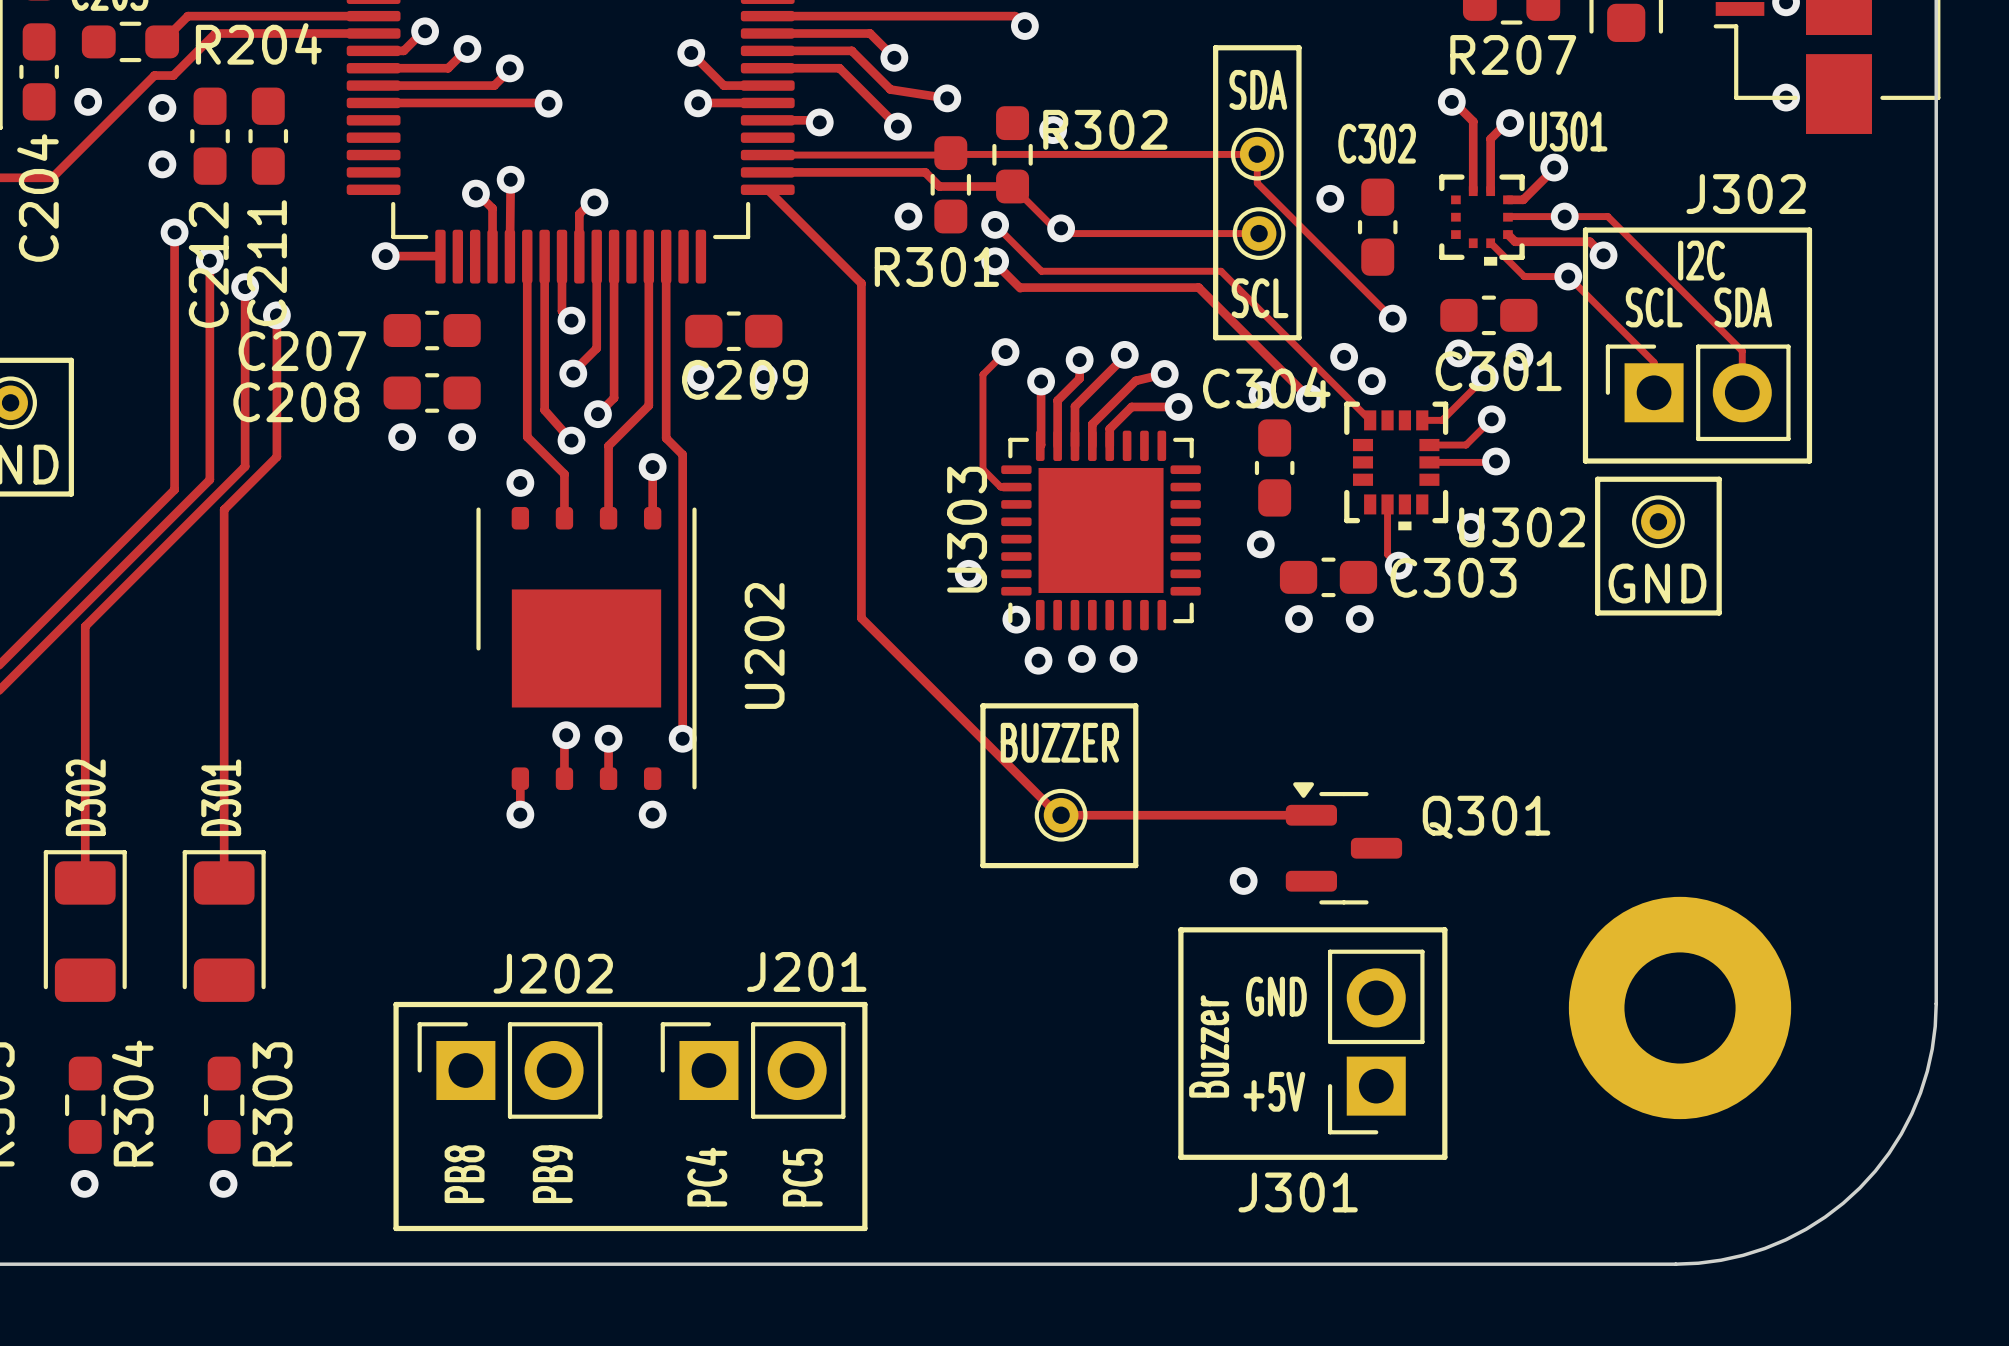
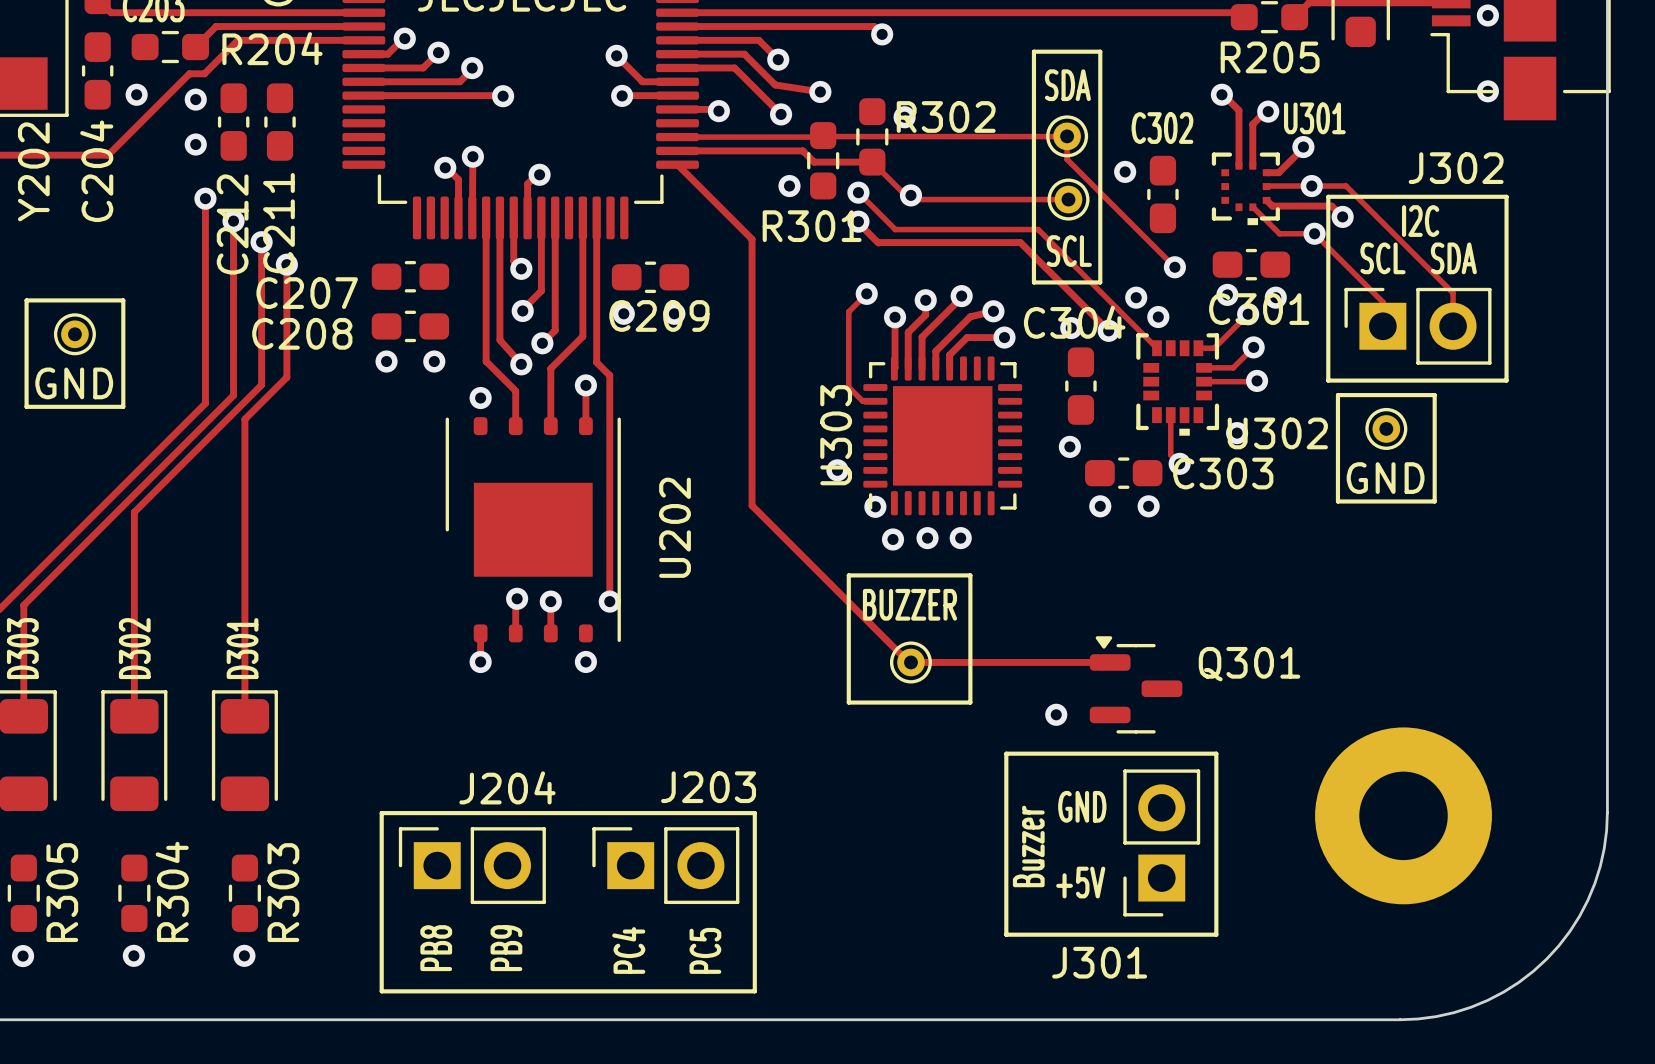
R207 name: R207 (1513, 54) -> R205 (1270, 57)
track: (385, 256) (439, 256) -> none
via: (385, 256) -> none
J201 name: J201 (806, 971) -> J203 (708, 787)
J202 name: J202 (553, 973) -> J204 (507, 787)

